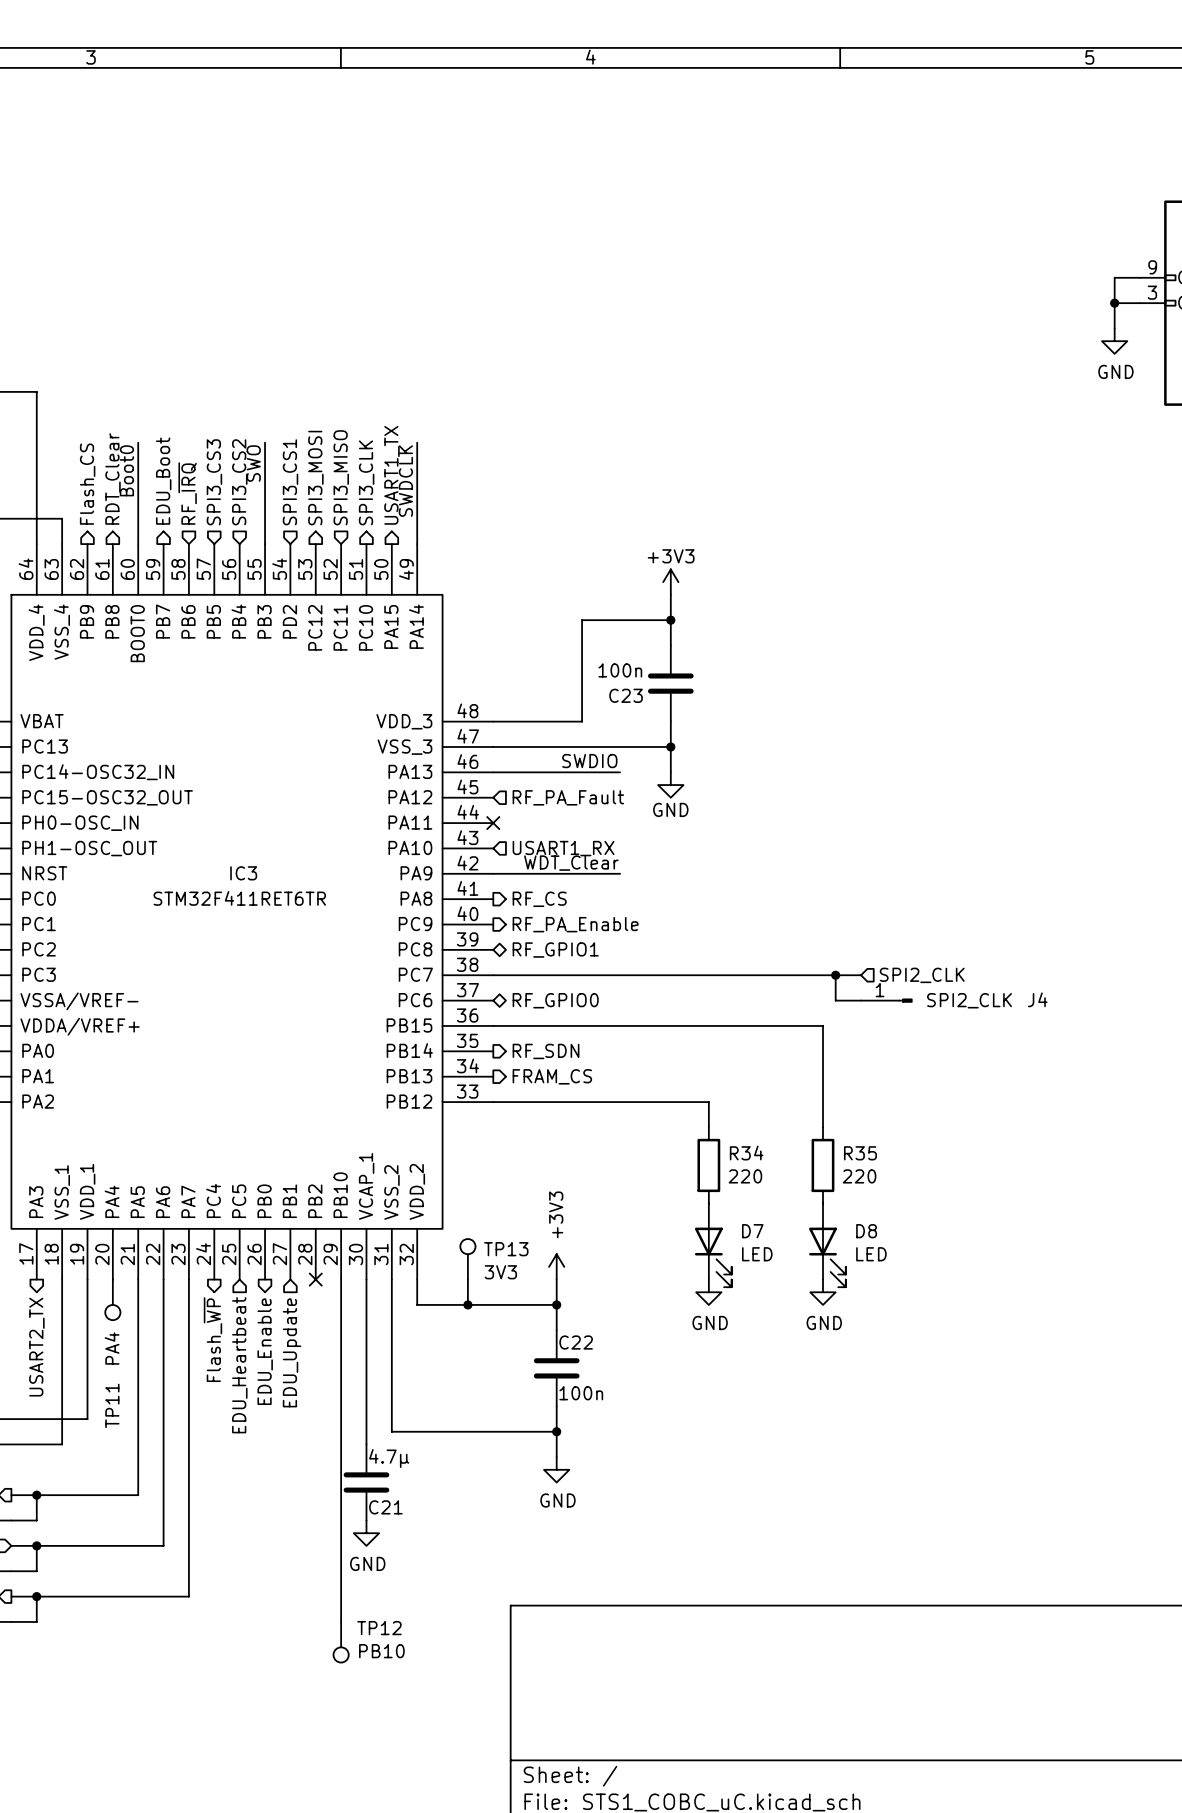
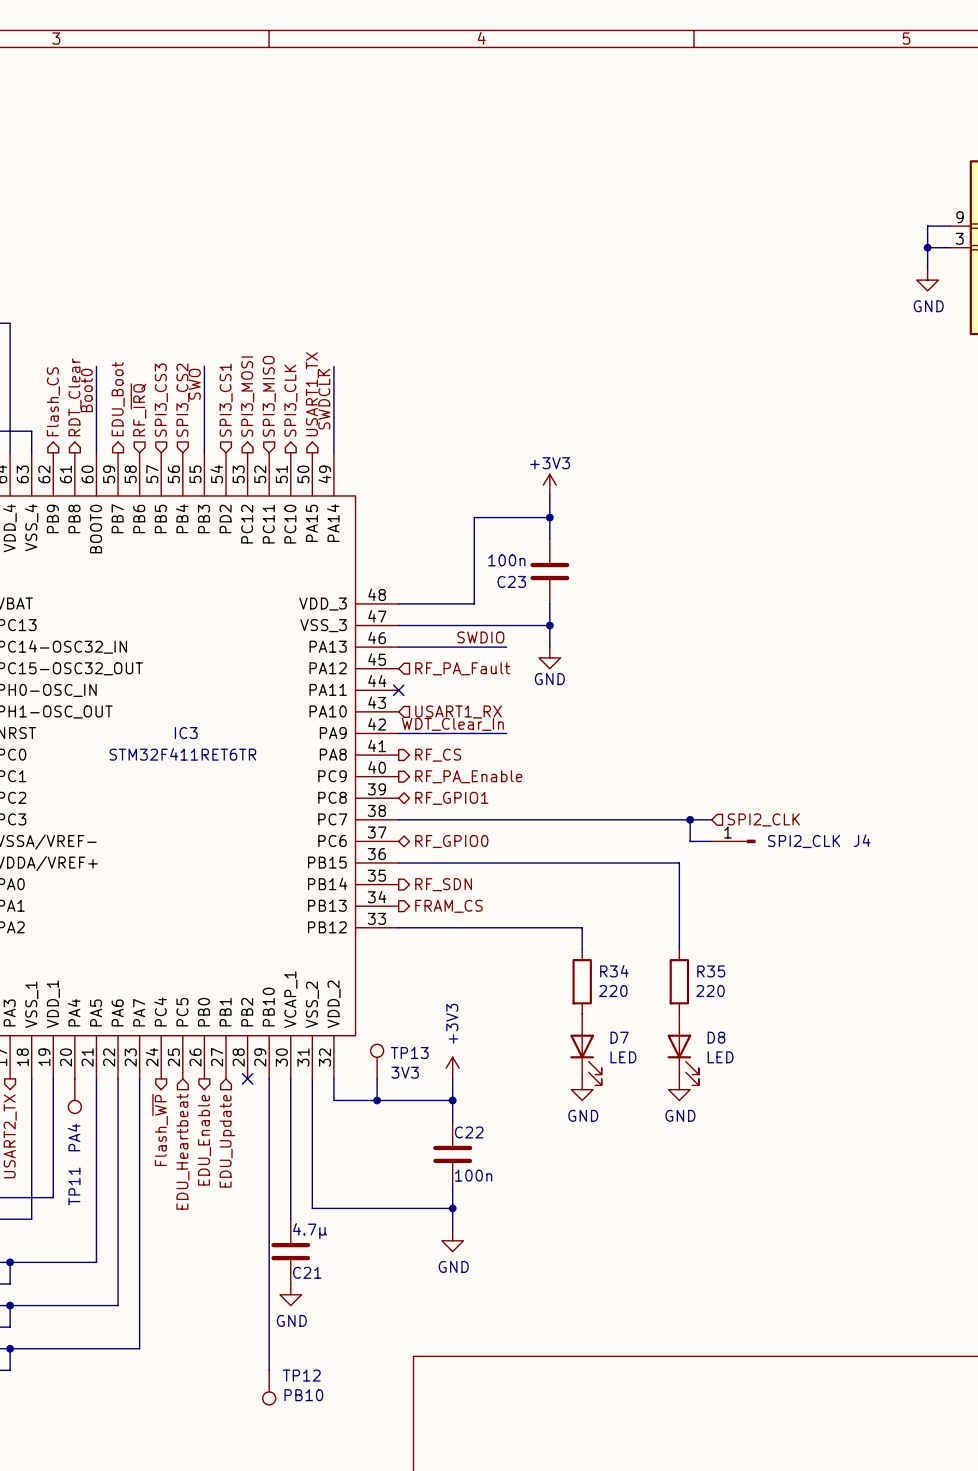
label: WDT_Clear (571, 863) -> WDT_Clear_In (452, 724)

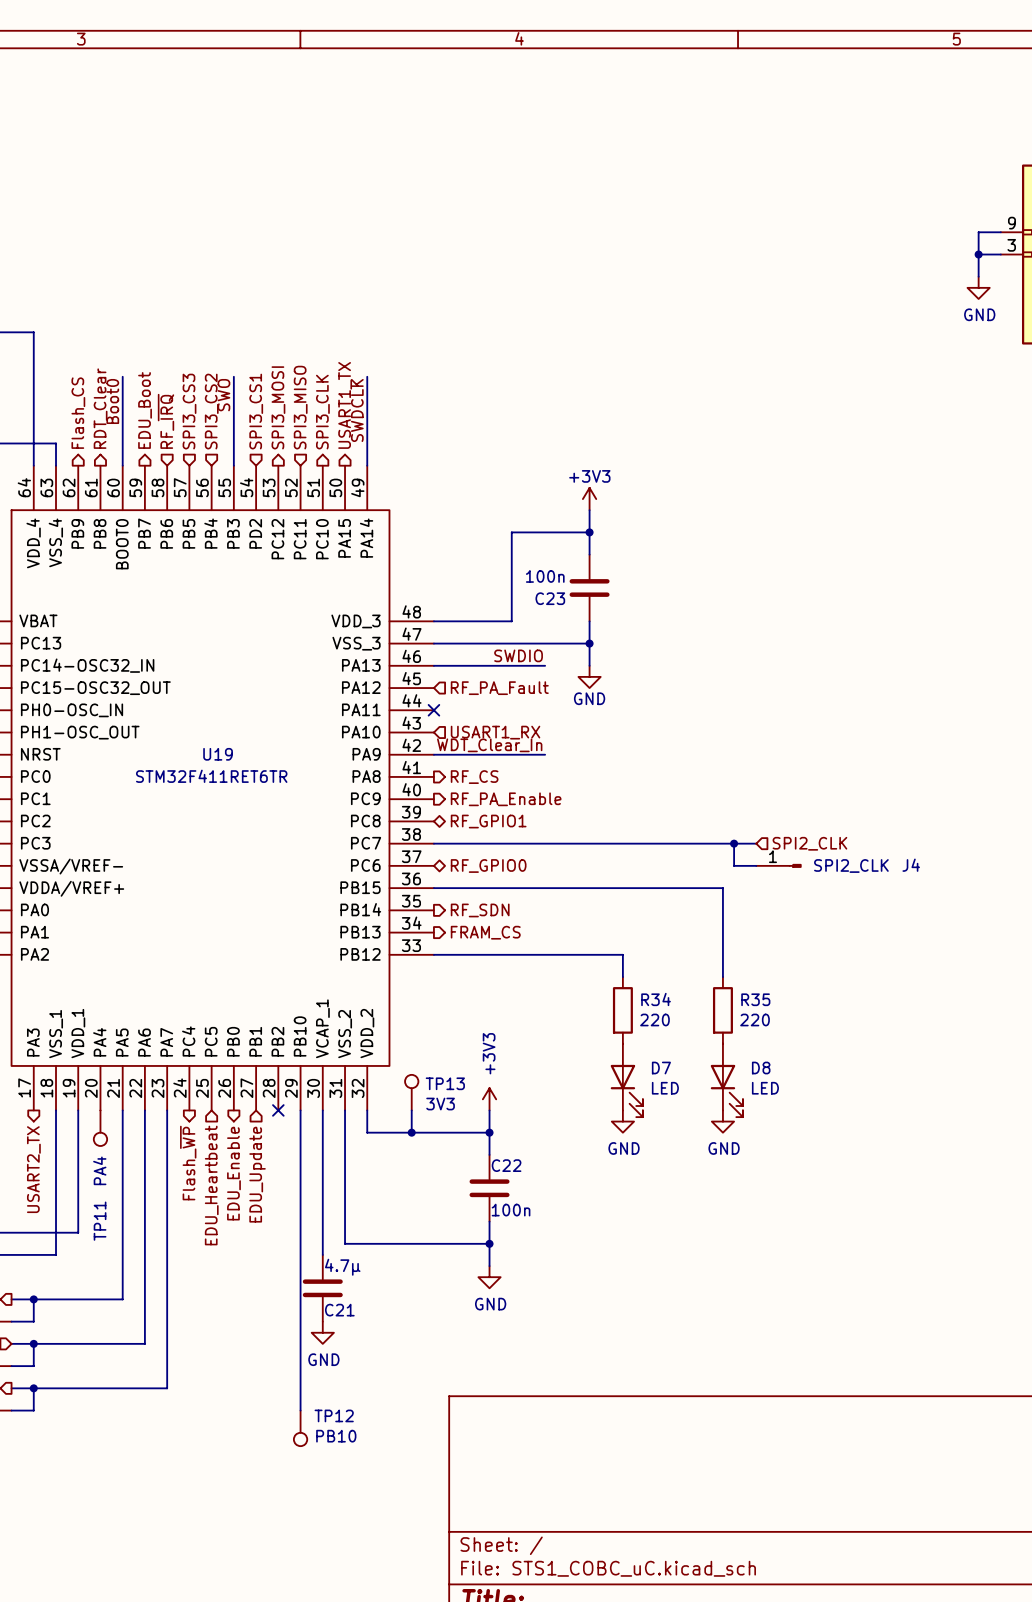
IC3 name: IC3 (186, 733) -> U19 (218, 754)

